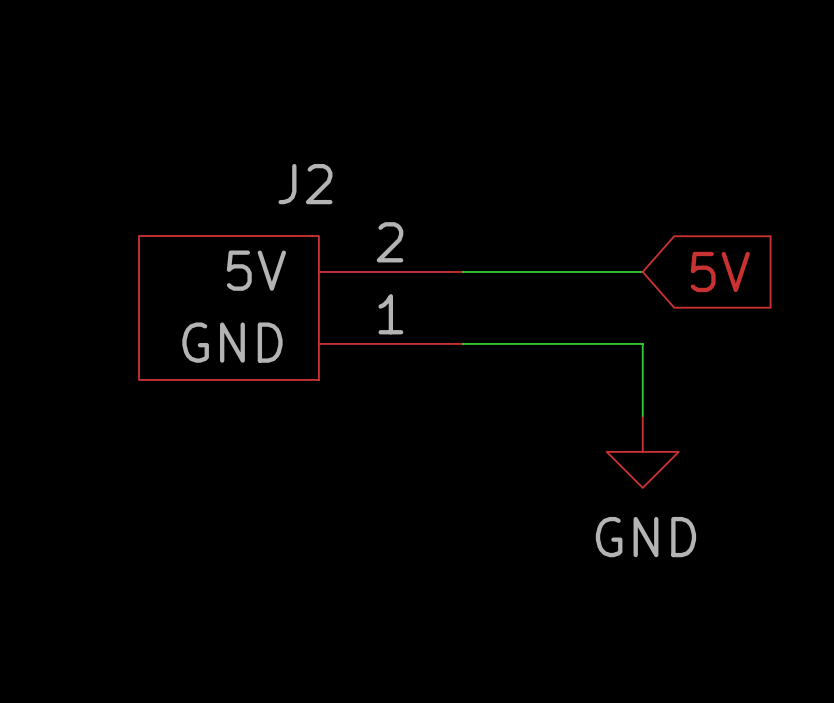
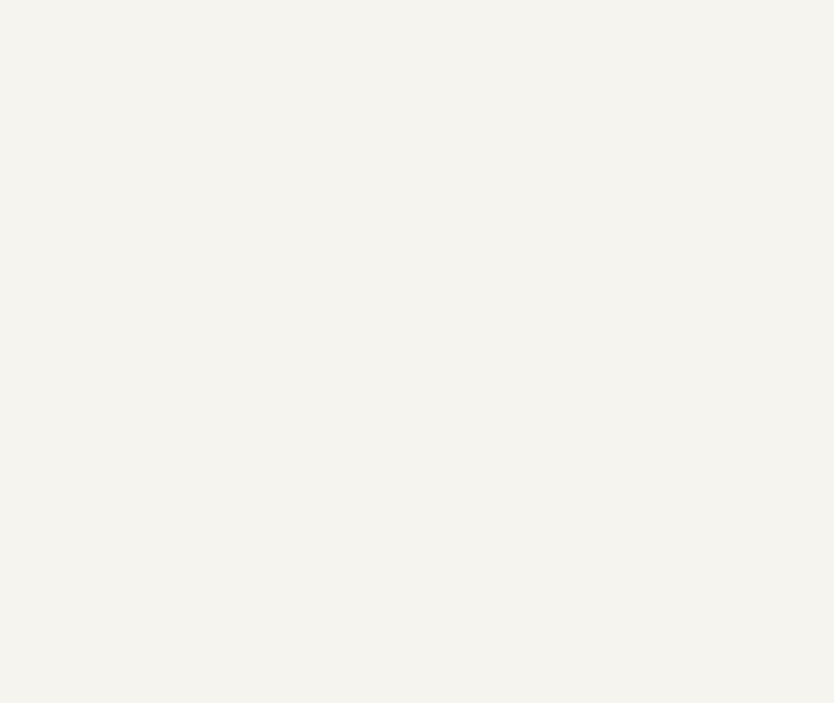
wire: (462, 271) (642, 271) -> none
global label: 5V (720, 271) -> none
J2: (300, 307) -> none
wire: (462, 343) (642, 343) (642, 415) -> none
power symbol: GND (642, 451) -> none

